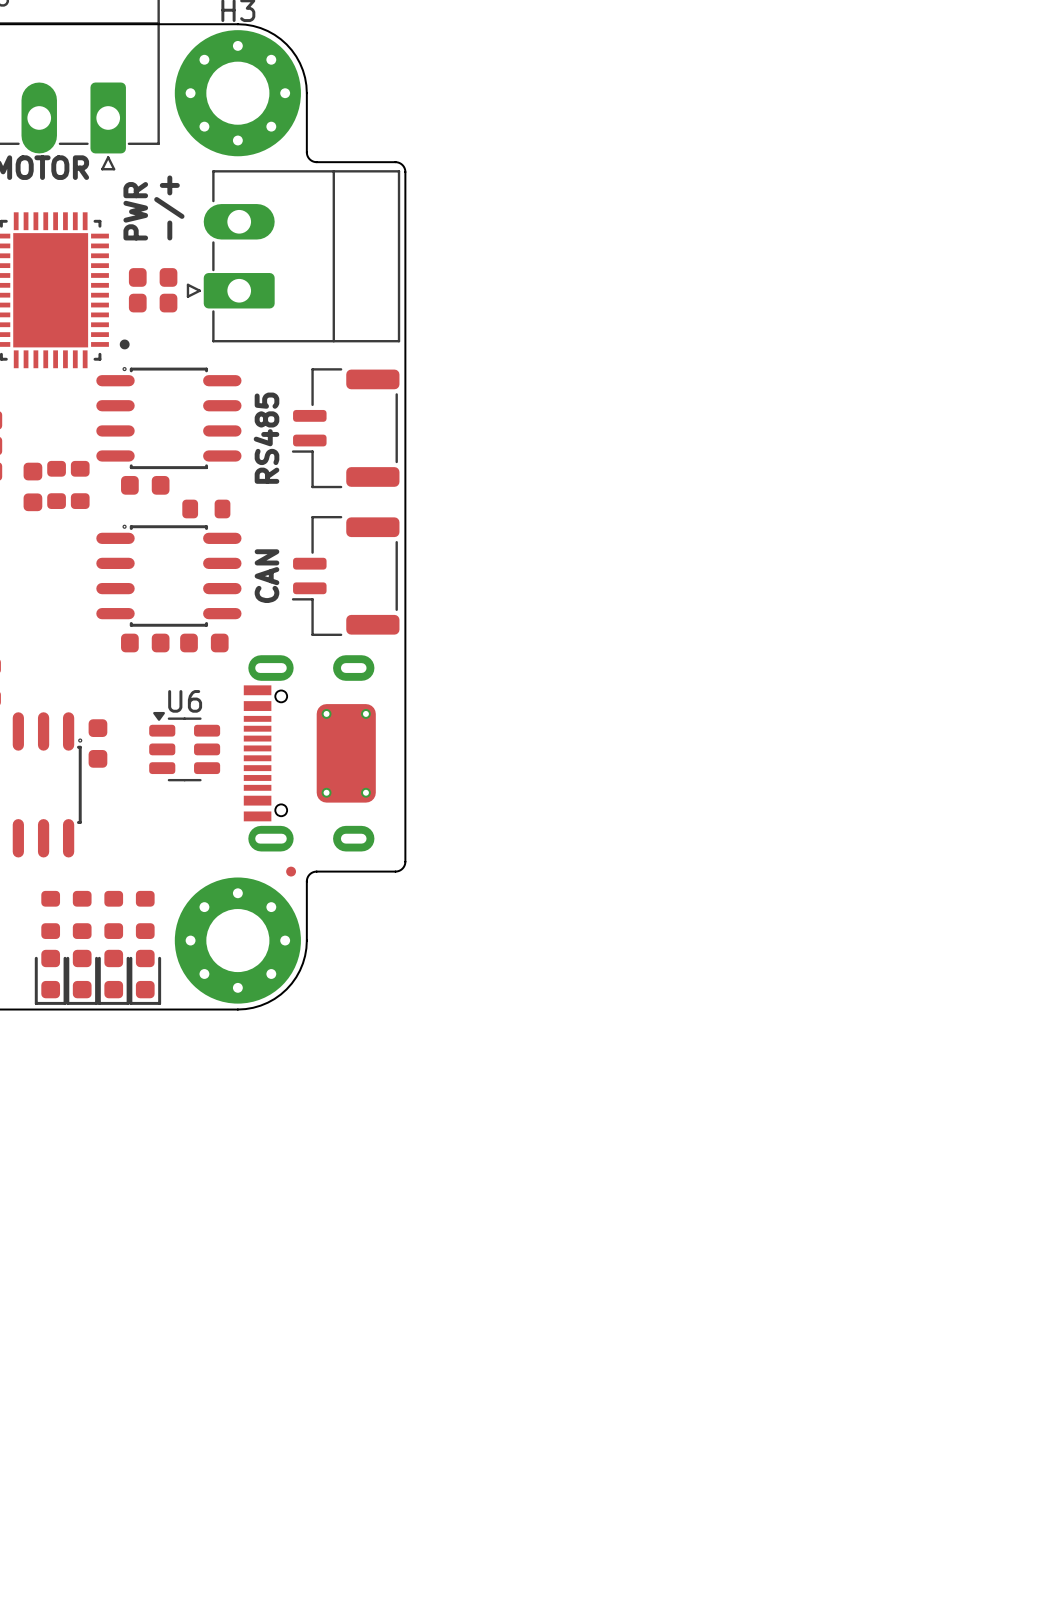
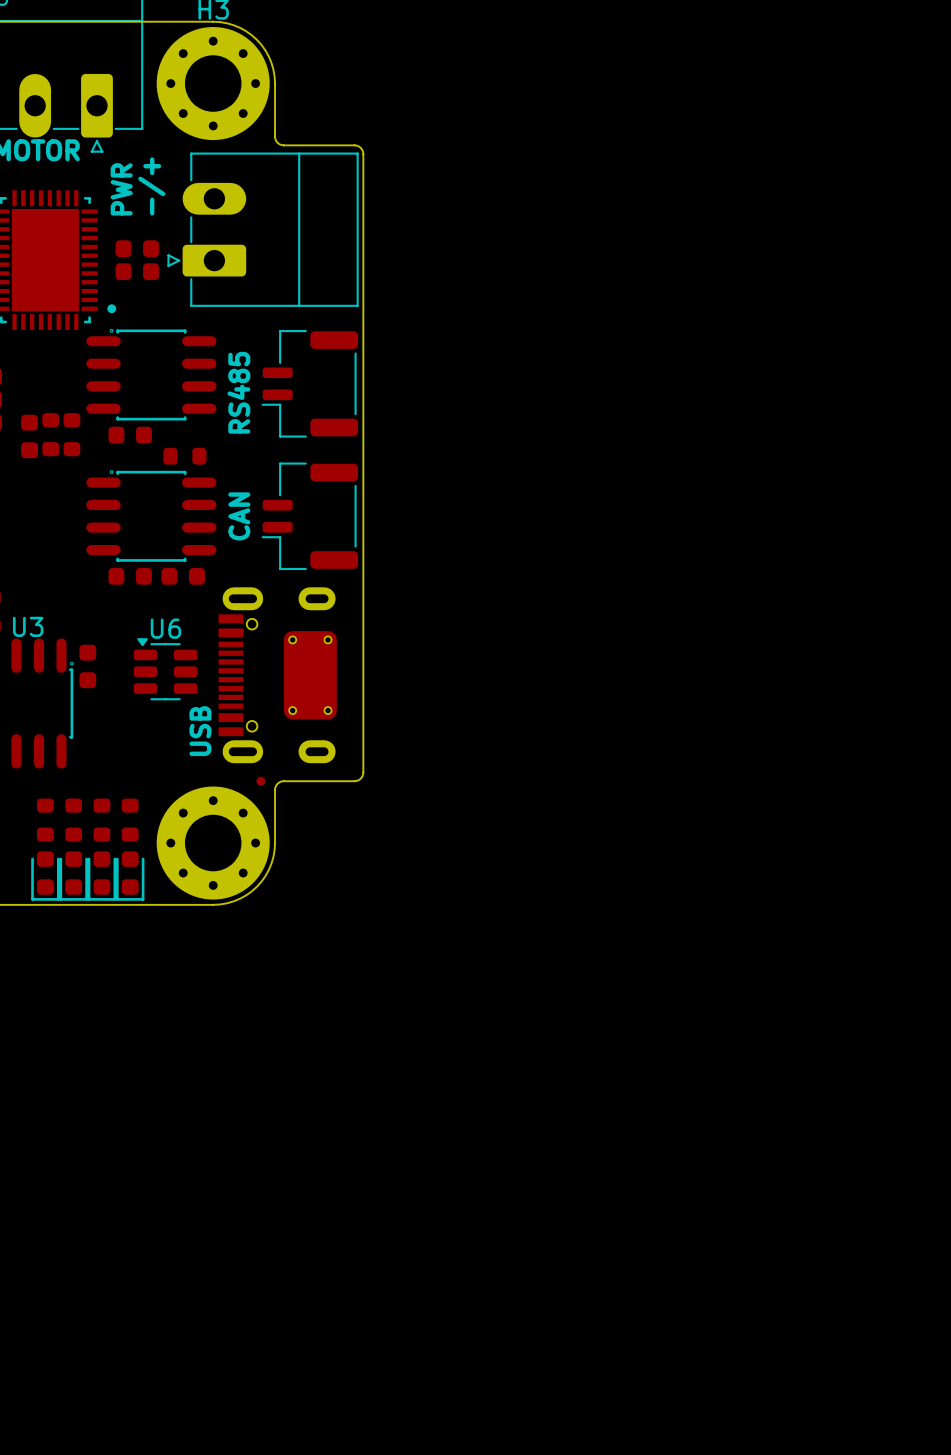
U3 name: none -> U3 (28, 626)
text: none -> USB (200, 731)

